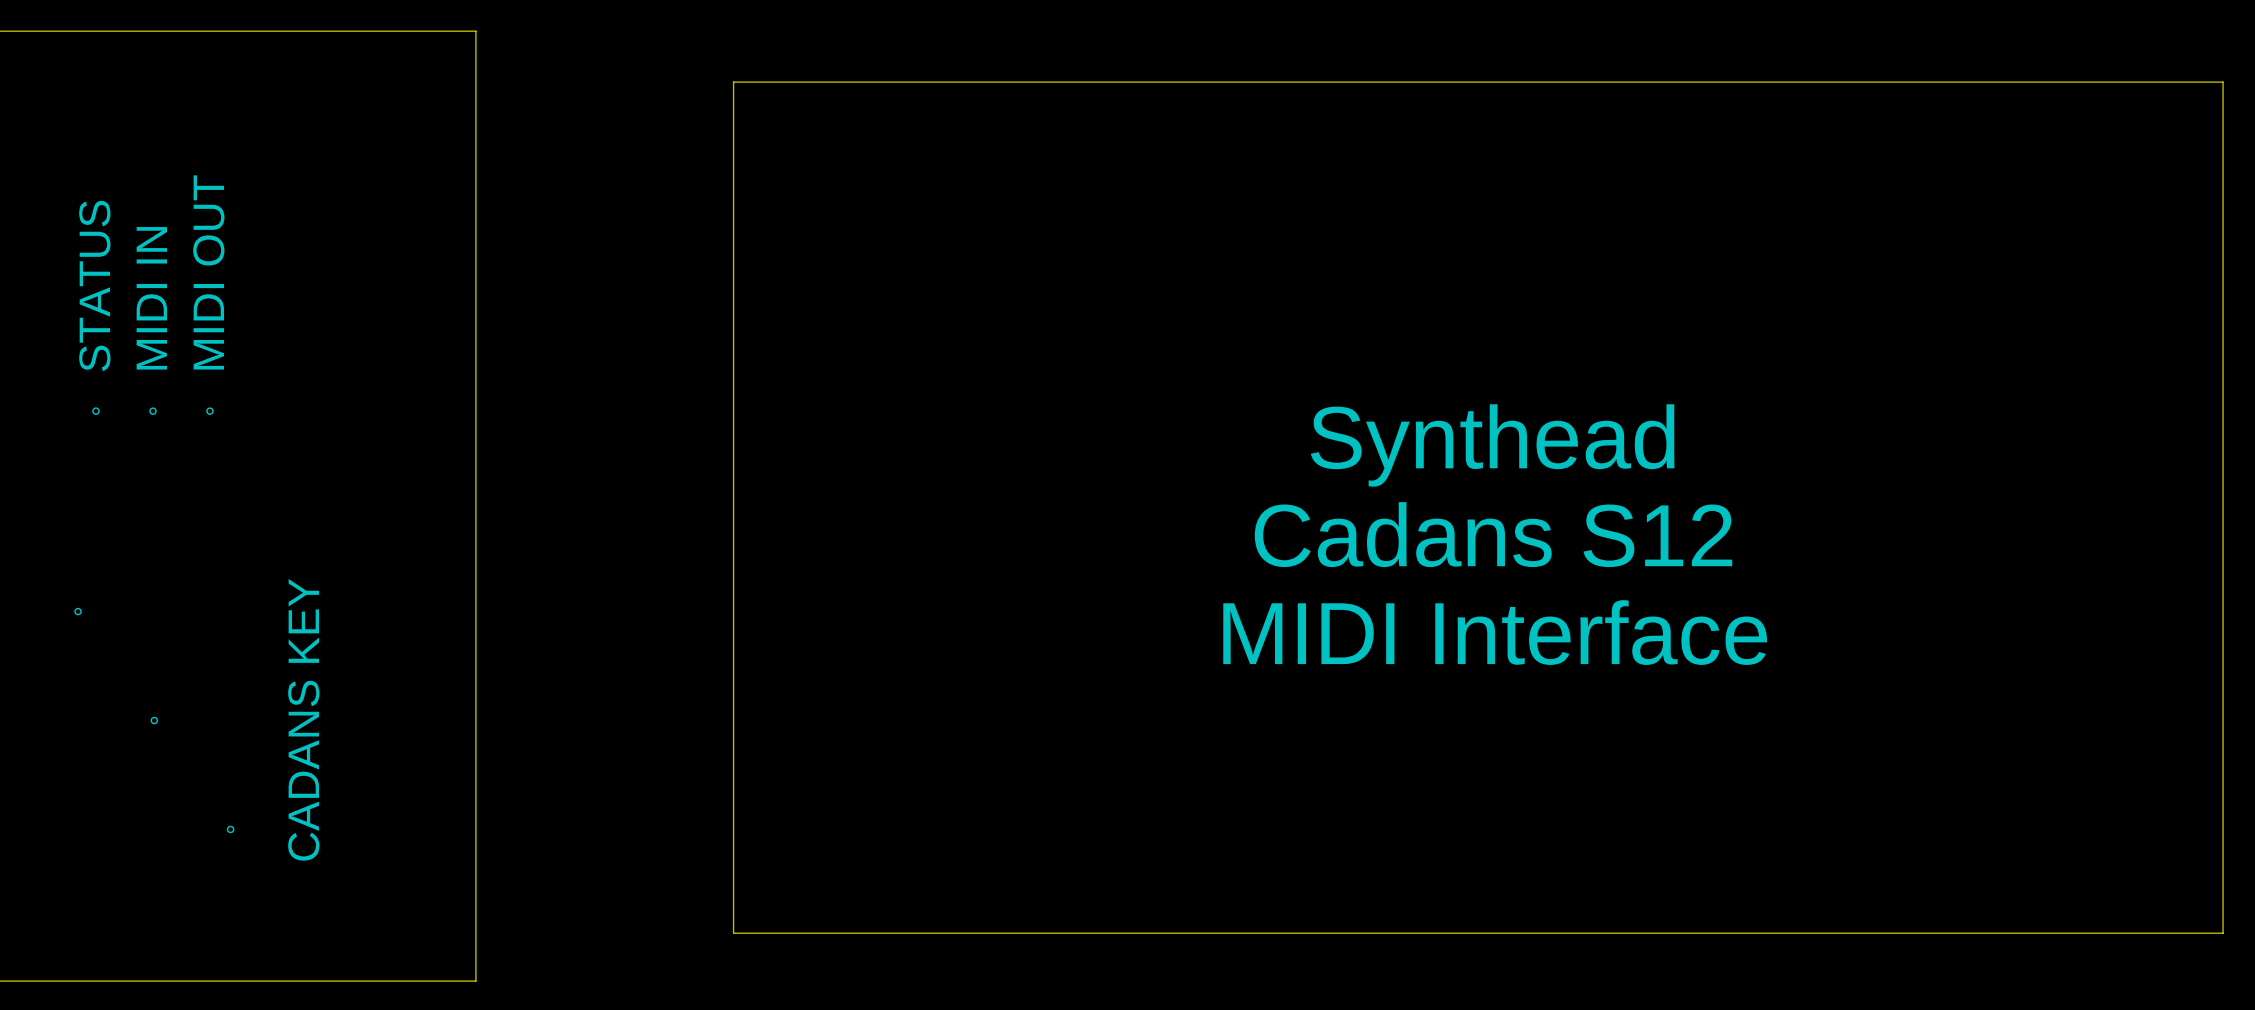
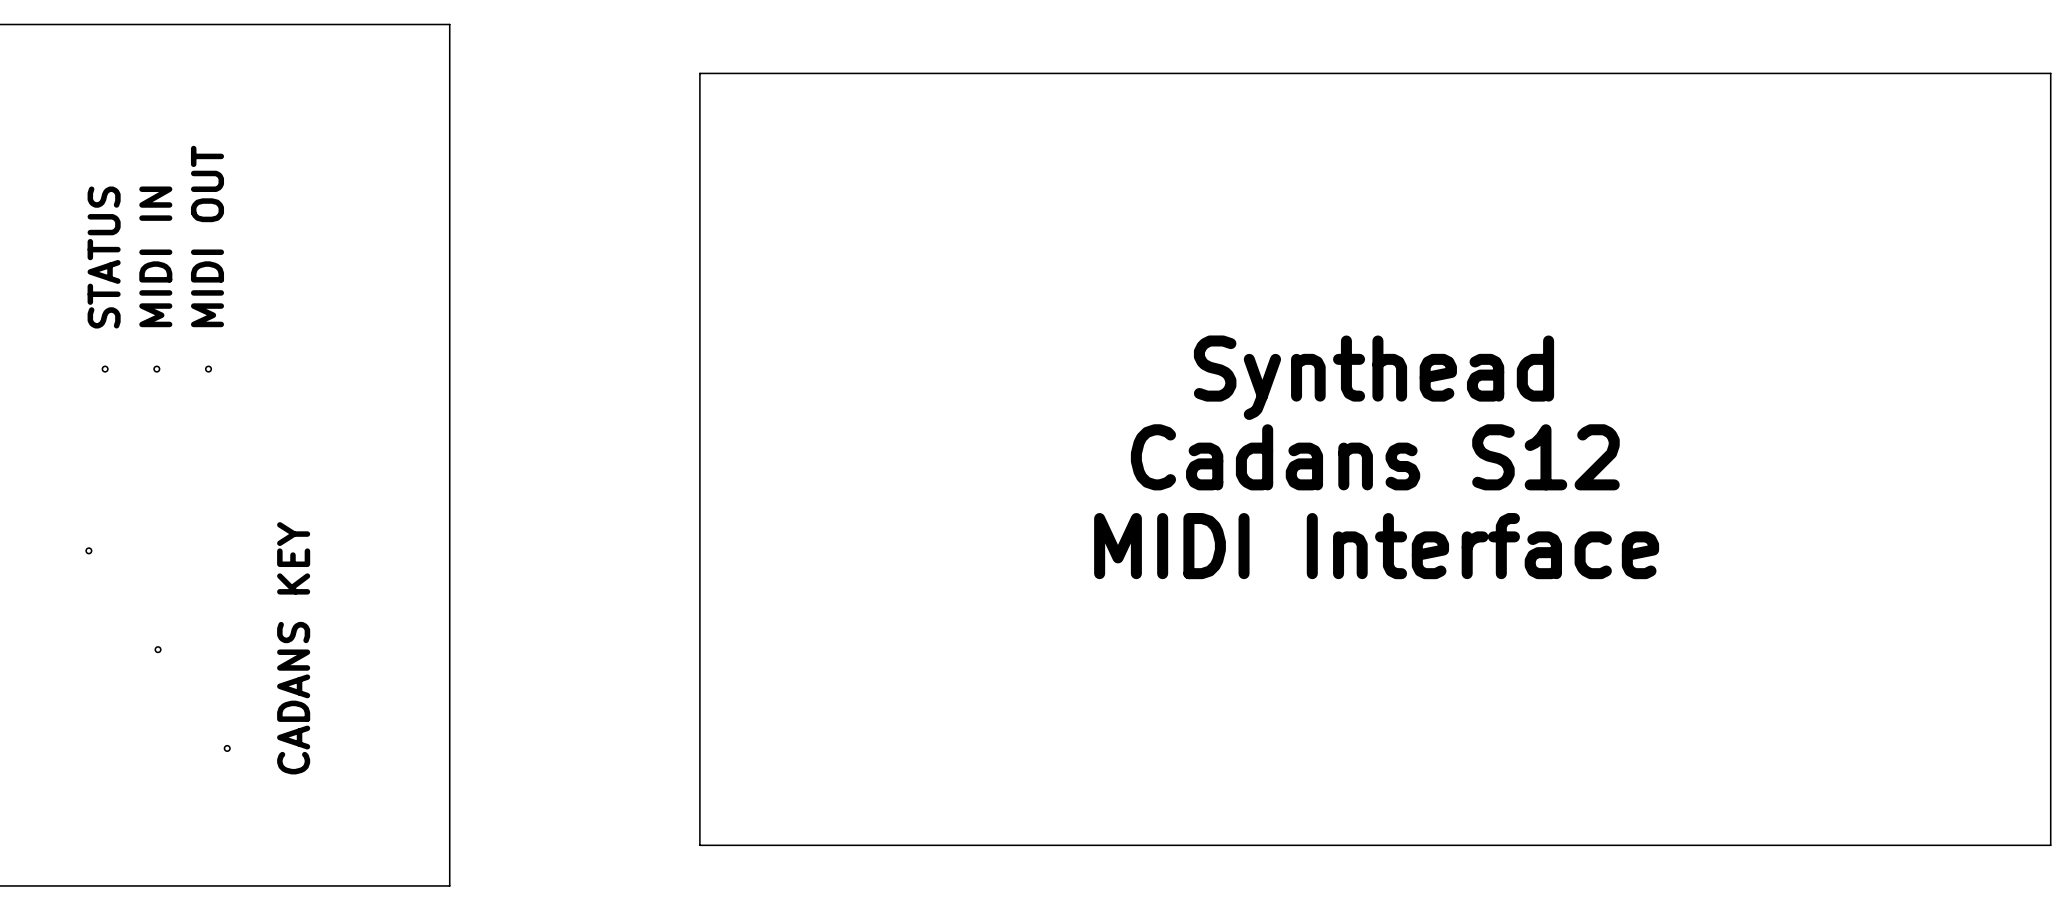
board edge: (733, 82) (733, 933) (2223, 933) (2223, 82) (733, 82) -> (699, 73) (699, 845) (2050, 845) (2050, 73) (699, 73)
text position: Synthead (1492, 445) -> Synthead (1374, 377)
text position: Cadans S12 (1493, 534) -> Cadans S12 (1375, 457)
text position: MIDI Interface (1495, 632) -> MIDI Interface (1376, 546)

